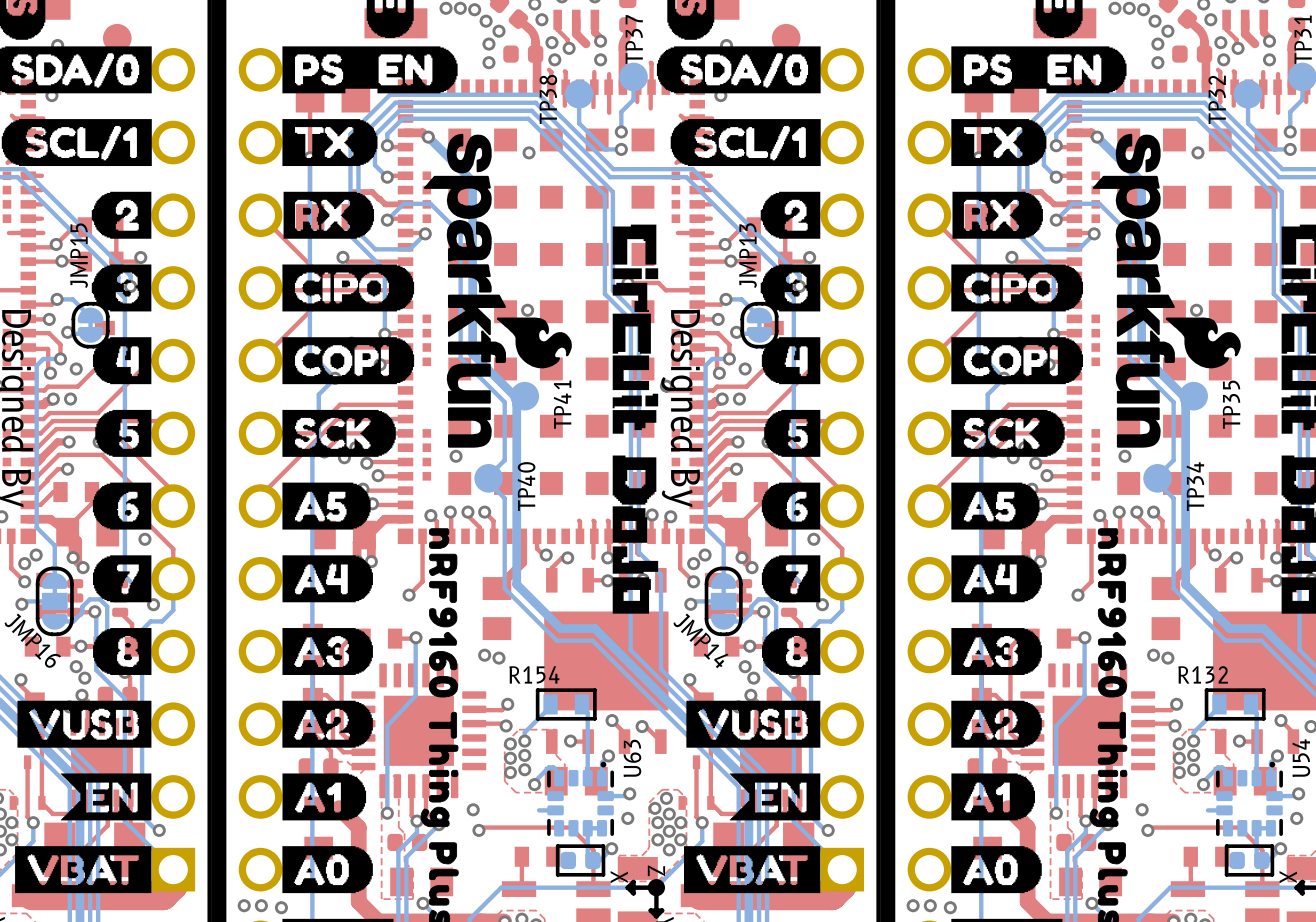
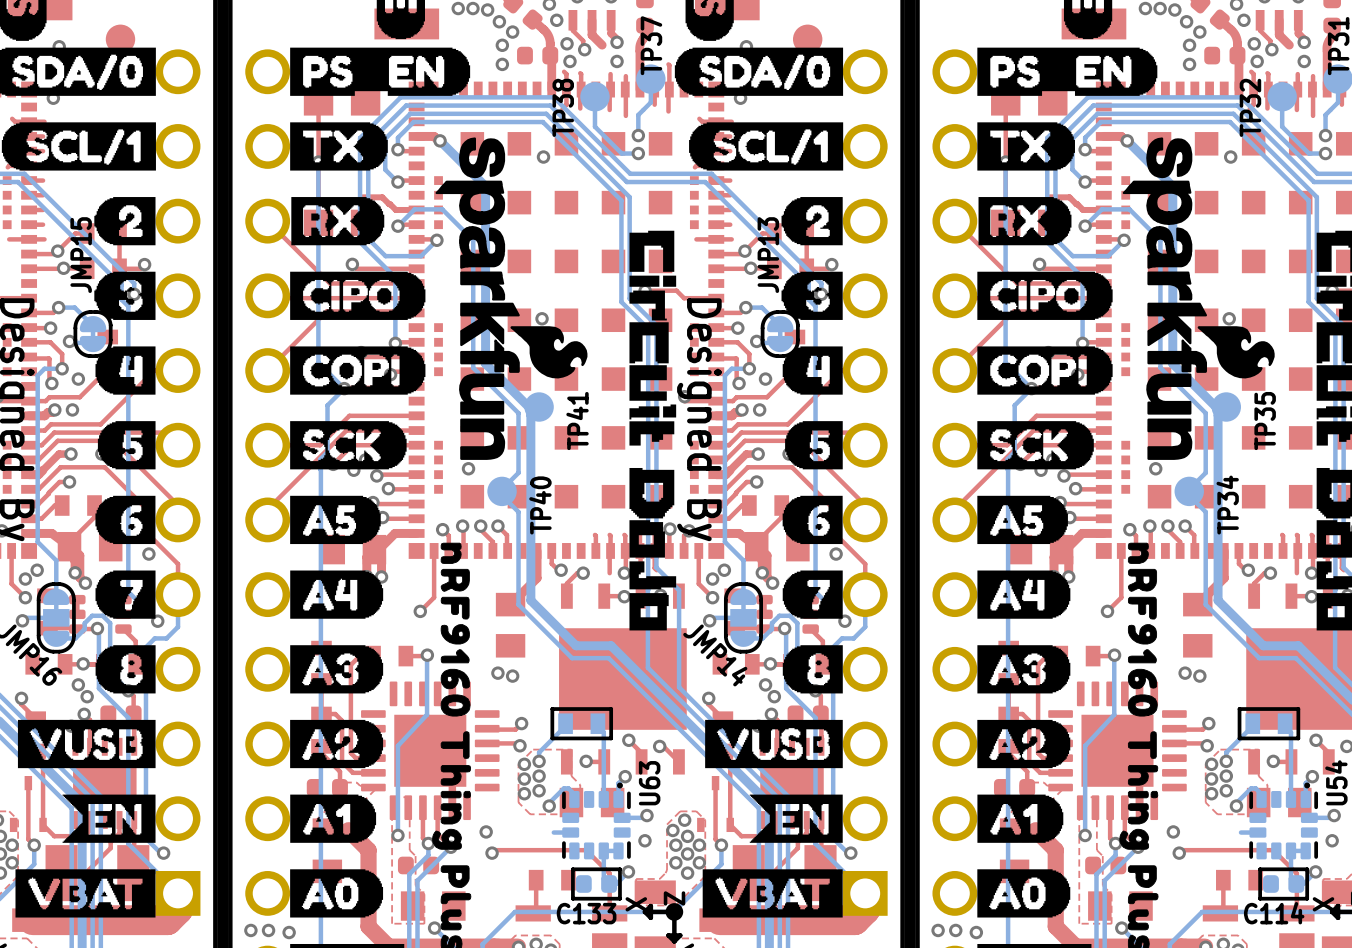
R154 name: R154 (534, 674) -> none
R132 name: R132 (1203, 674) -> none
C133 name: none -> C133 (586, 913)
C114 name: none -> C114 (1274, 913)

